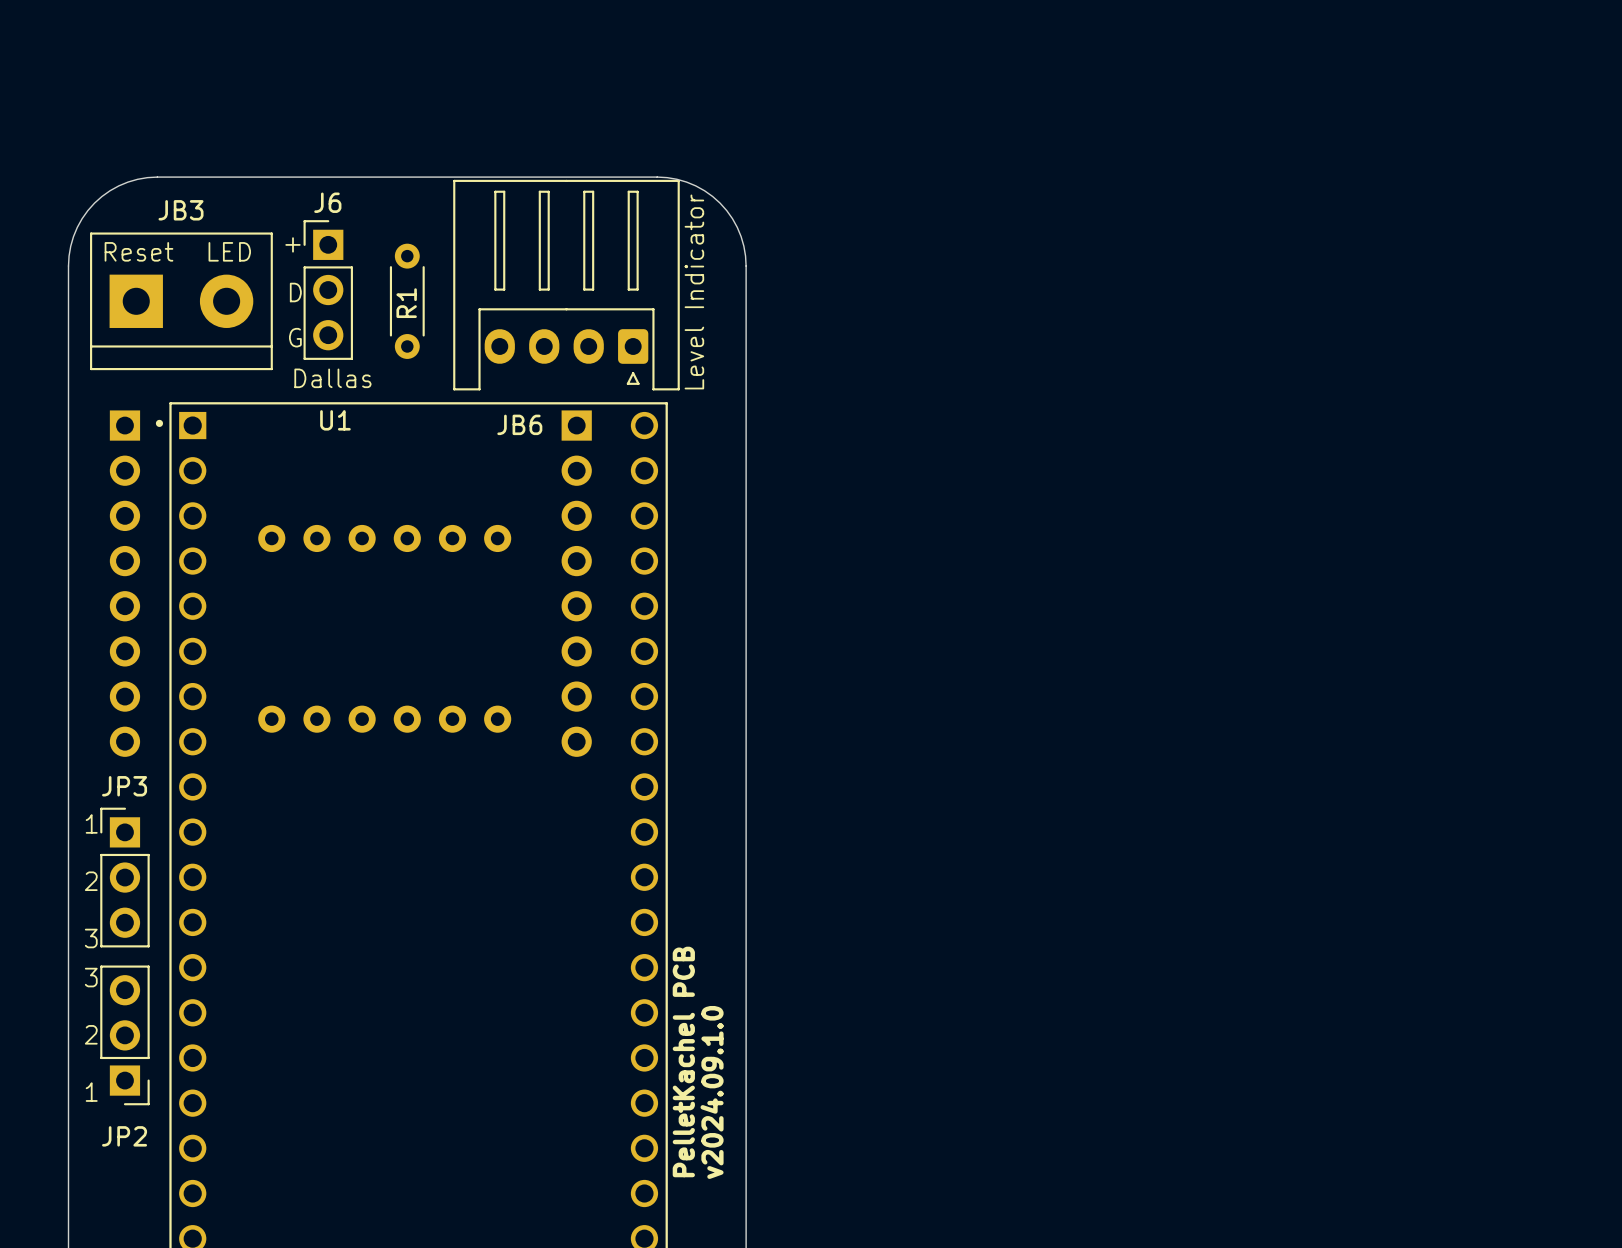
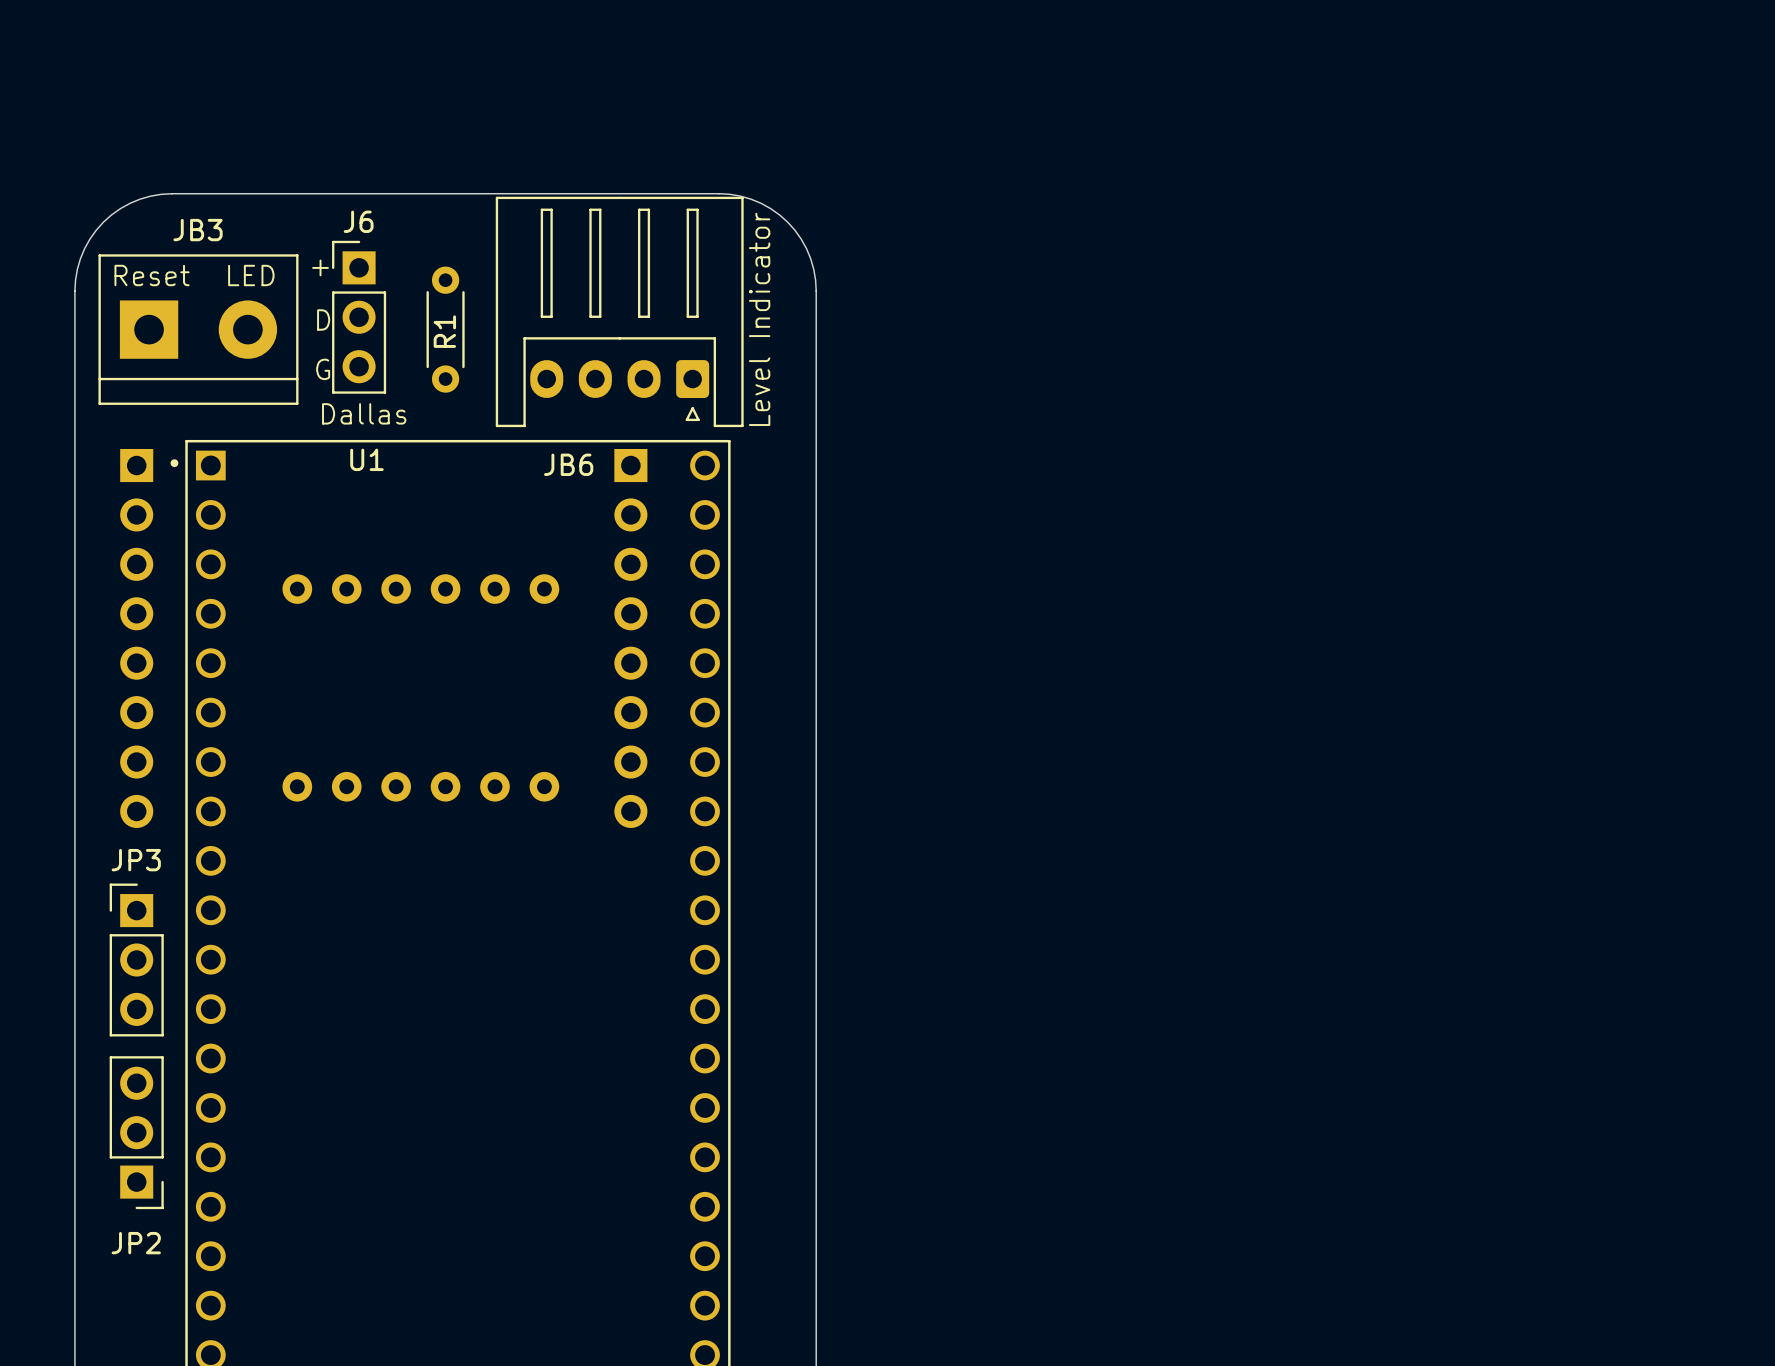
text: 1 (91, 823) -> none
text: 2 (91, 881) -> none
text: 3 (91, 938) -> none
text: 3 (91, 977) -> none
text: 2 (91, 1034) -> none
text: PelletKachel PCB (683, 1061) -> none
text: 1 (91, 1092) -> none
text: v2024.09.1.0 (712, 1092) -> none

